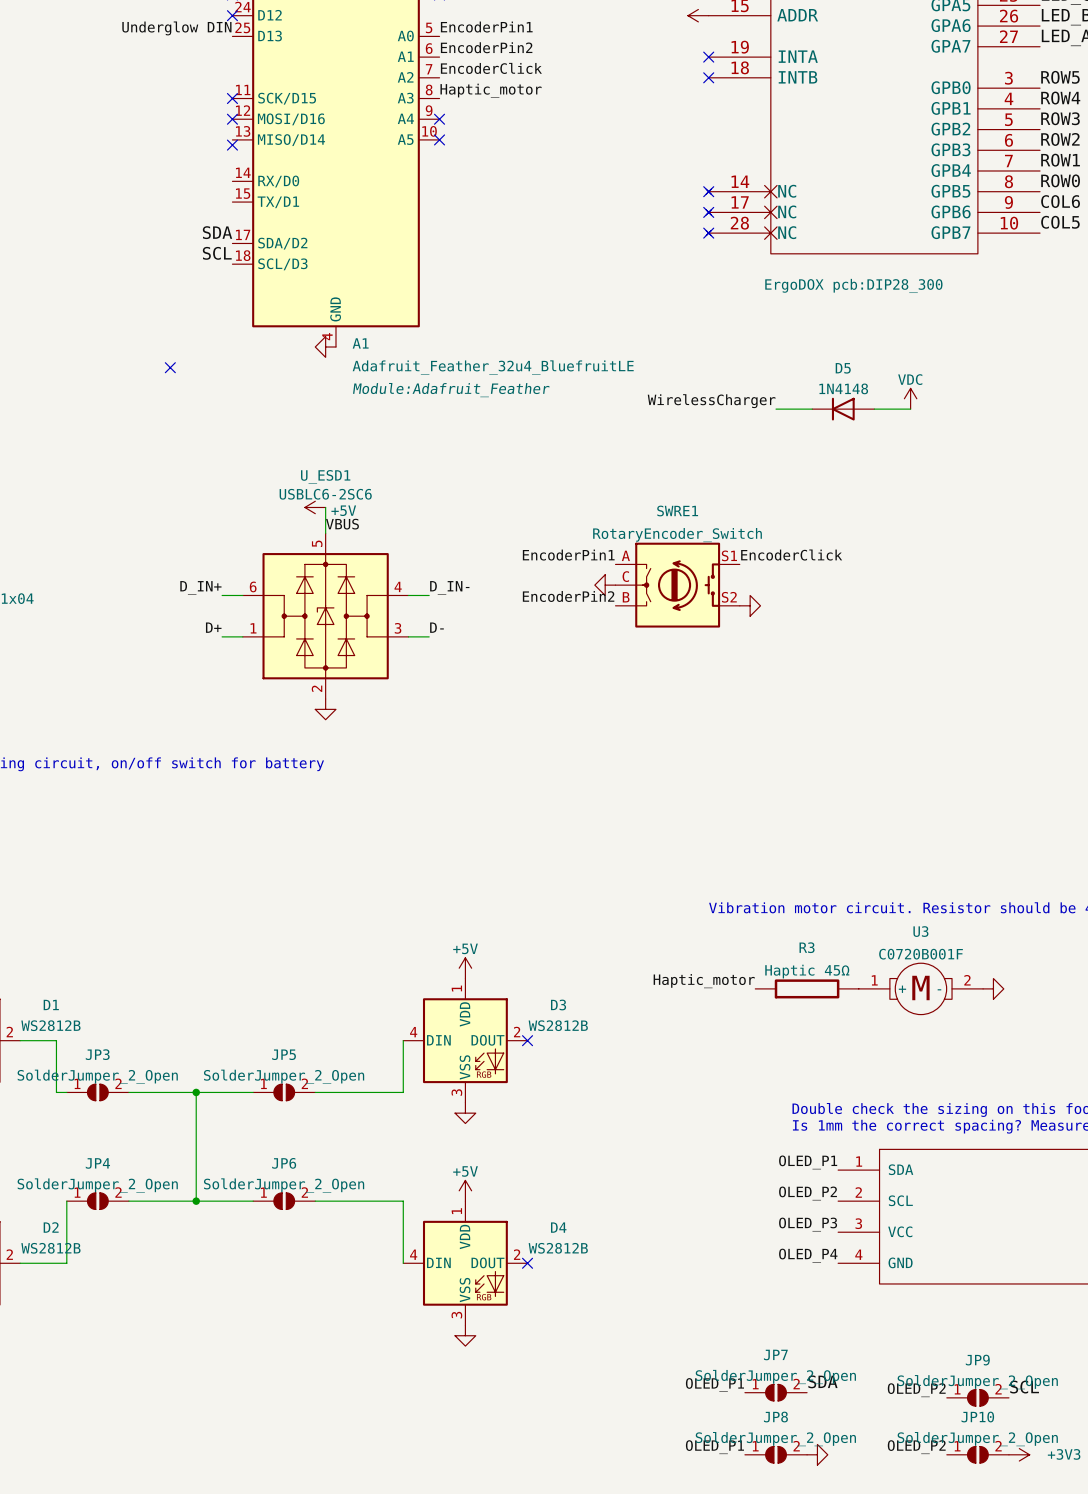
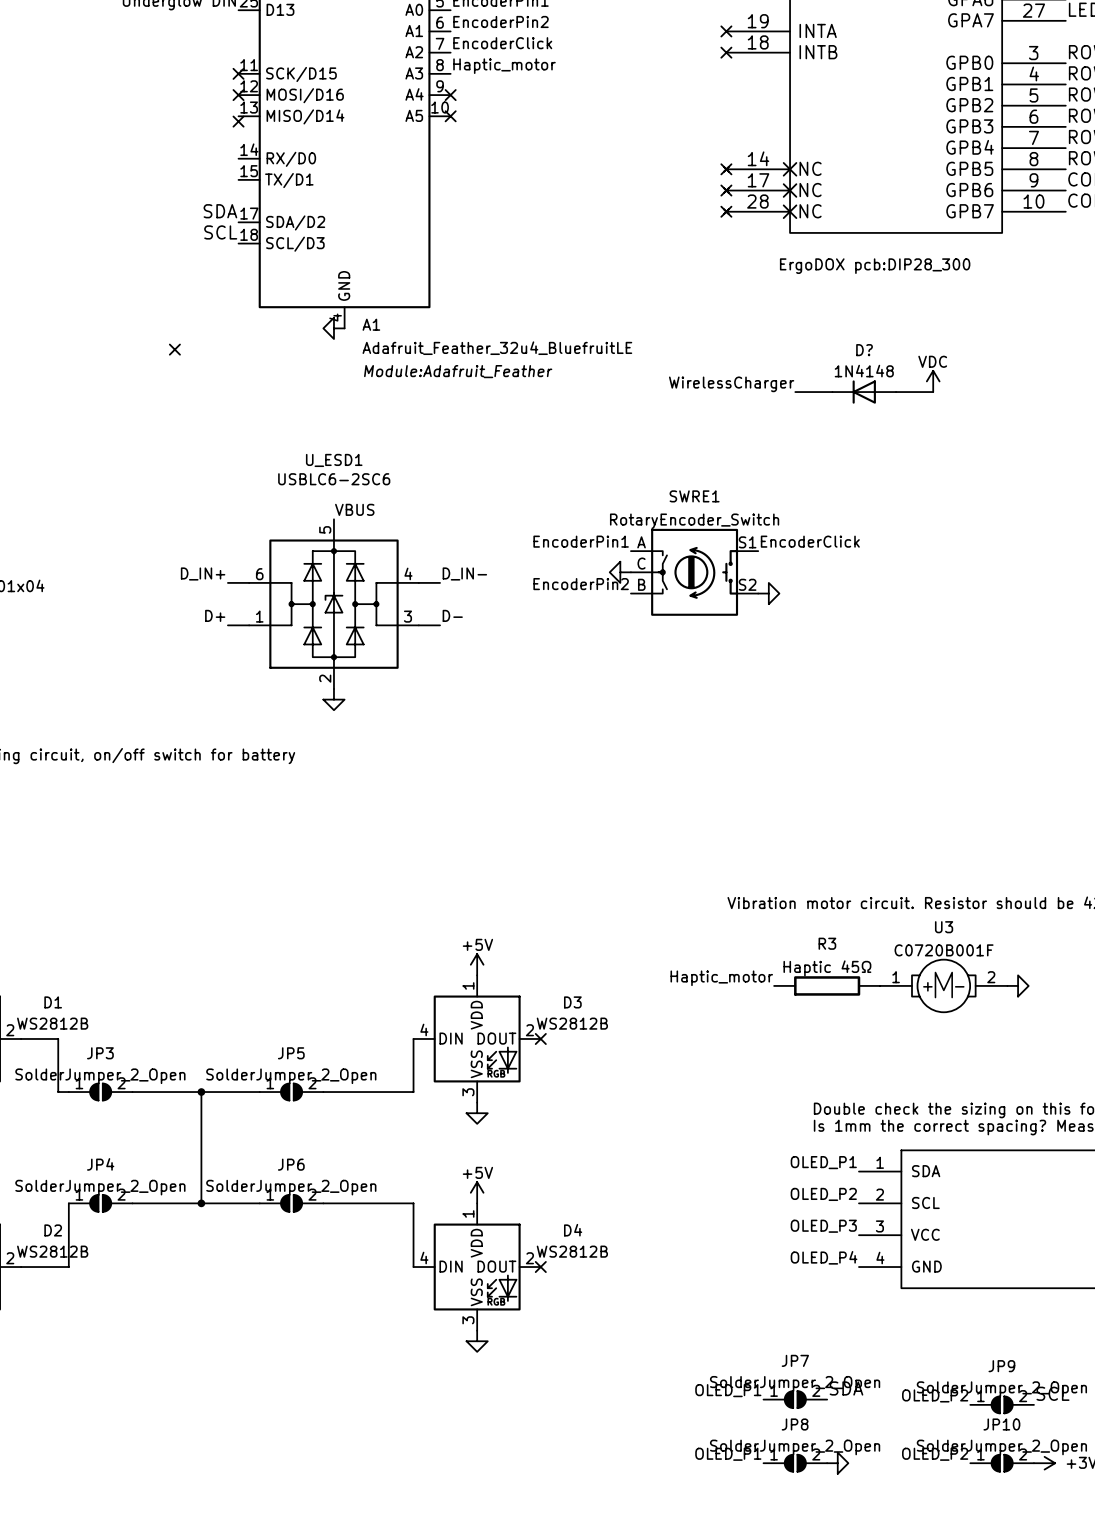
D5 name: D5 (843, 368) -> D? (864, 350)
power symbol: +5V (315, 507) -> none
wire: (325, 507) (325, 533) -> none

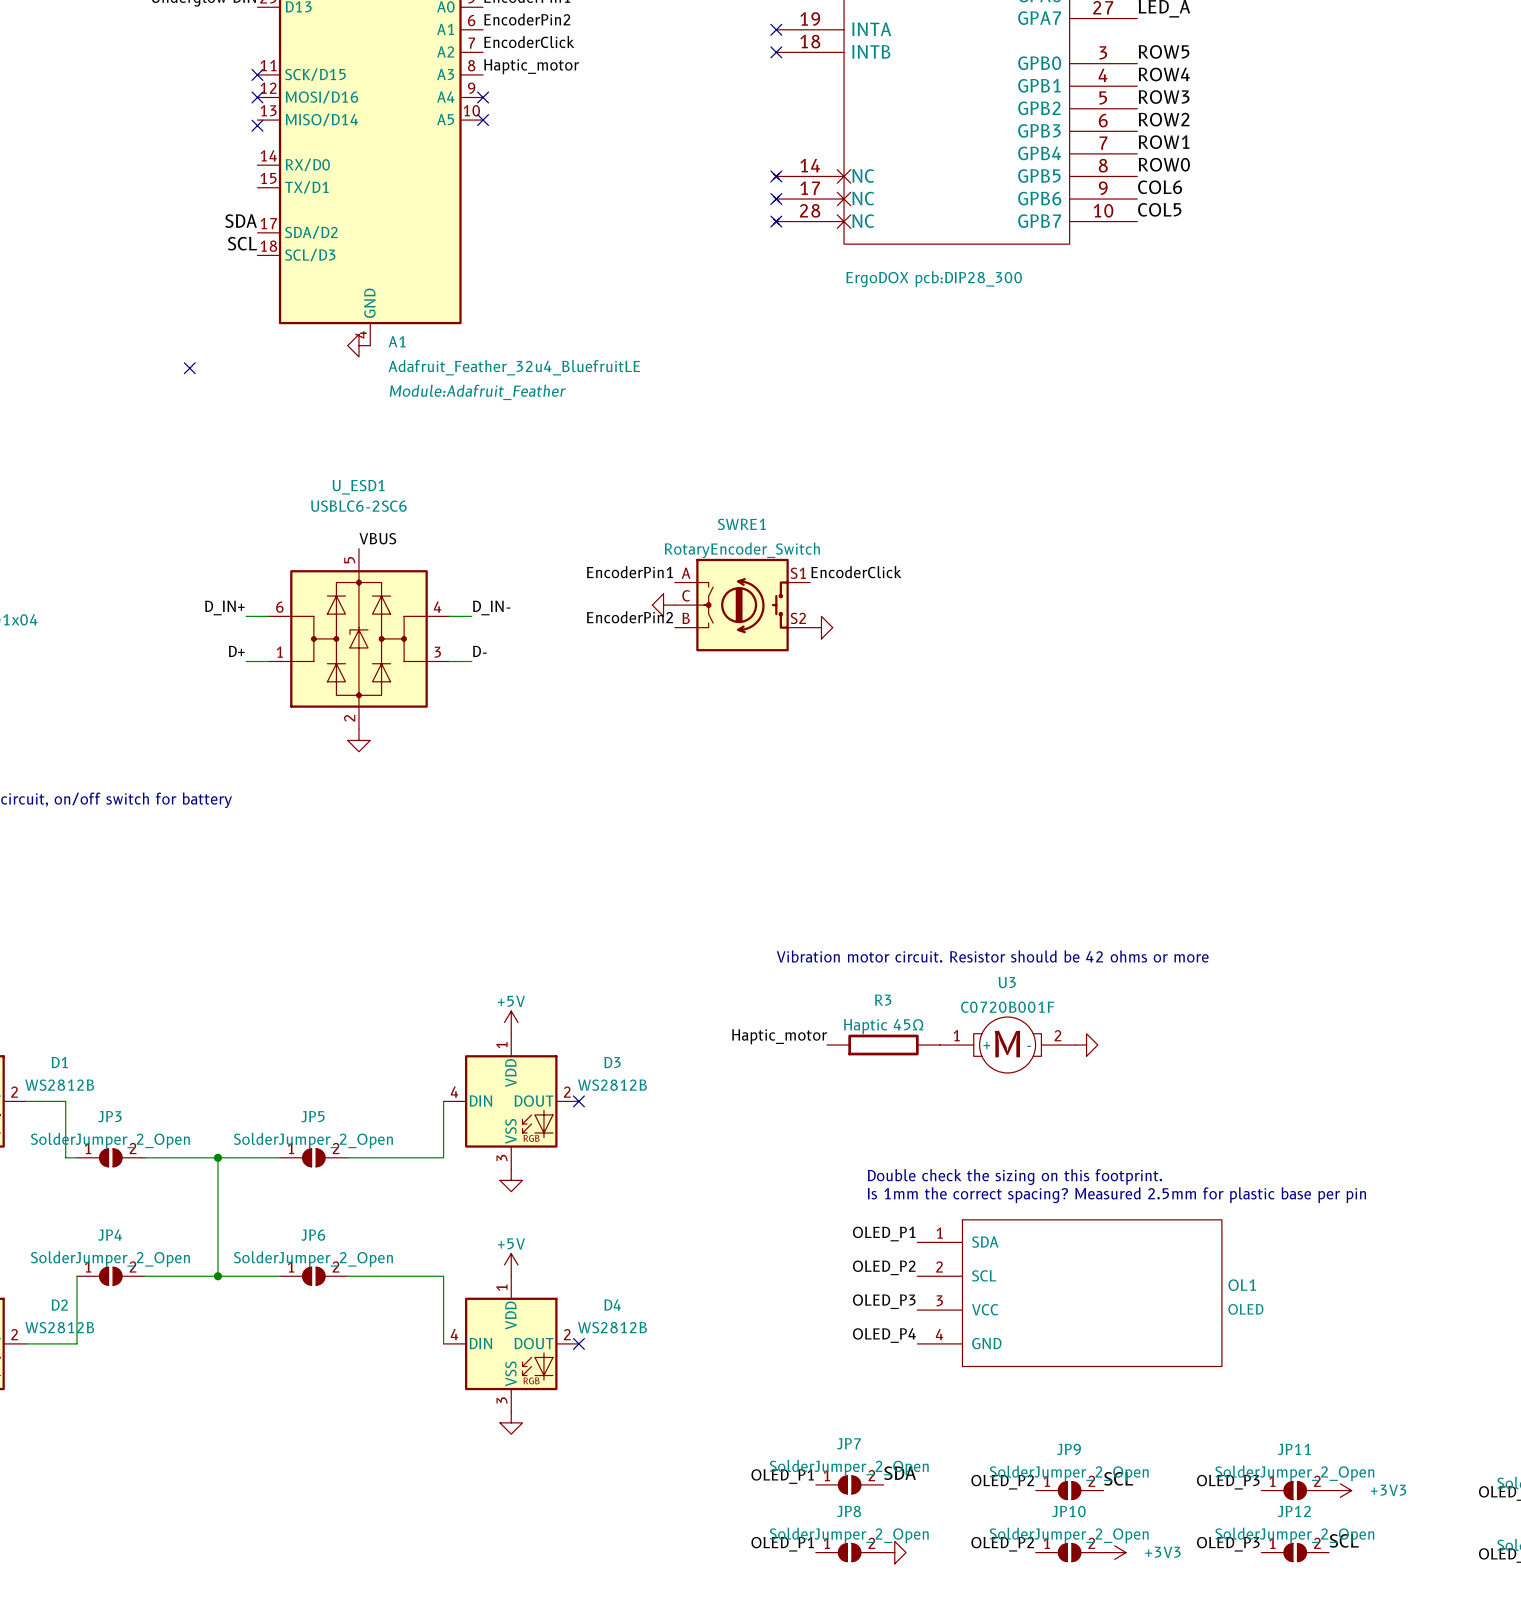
power symbol: VDC (933, 381) -> none
label: WirelessCharger (731, 384) -> none
wire: (795, 392) (832, 392) -> none
D?: 1N4148 (864, 392) -> none
wire: (896, 392) (933, 392) -> none

